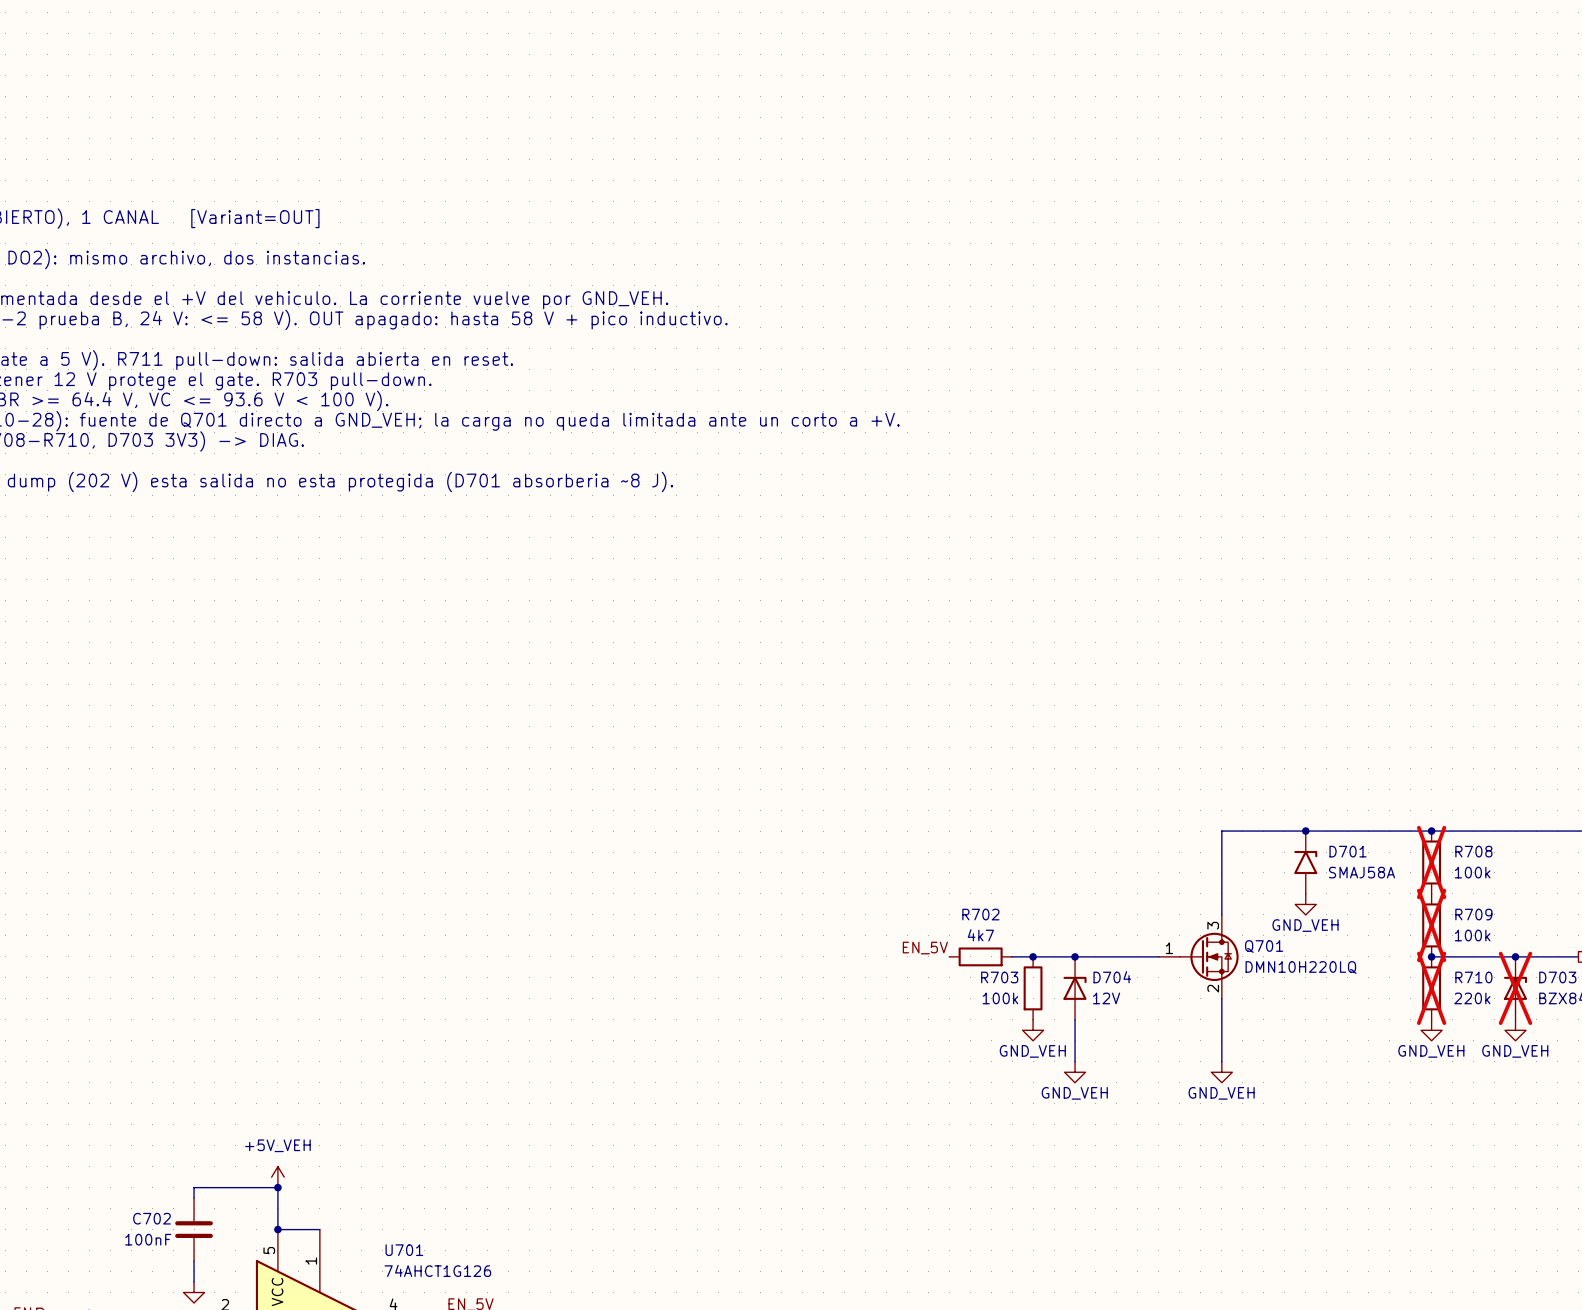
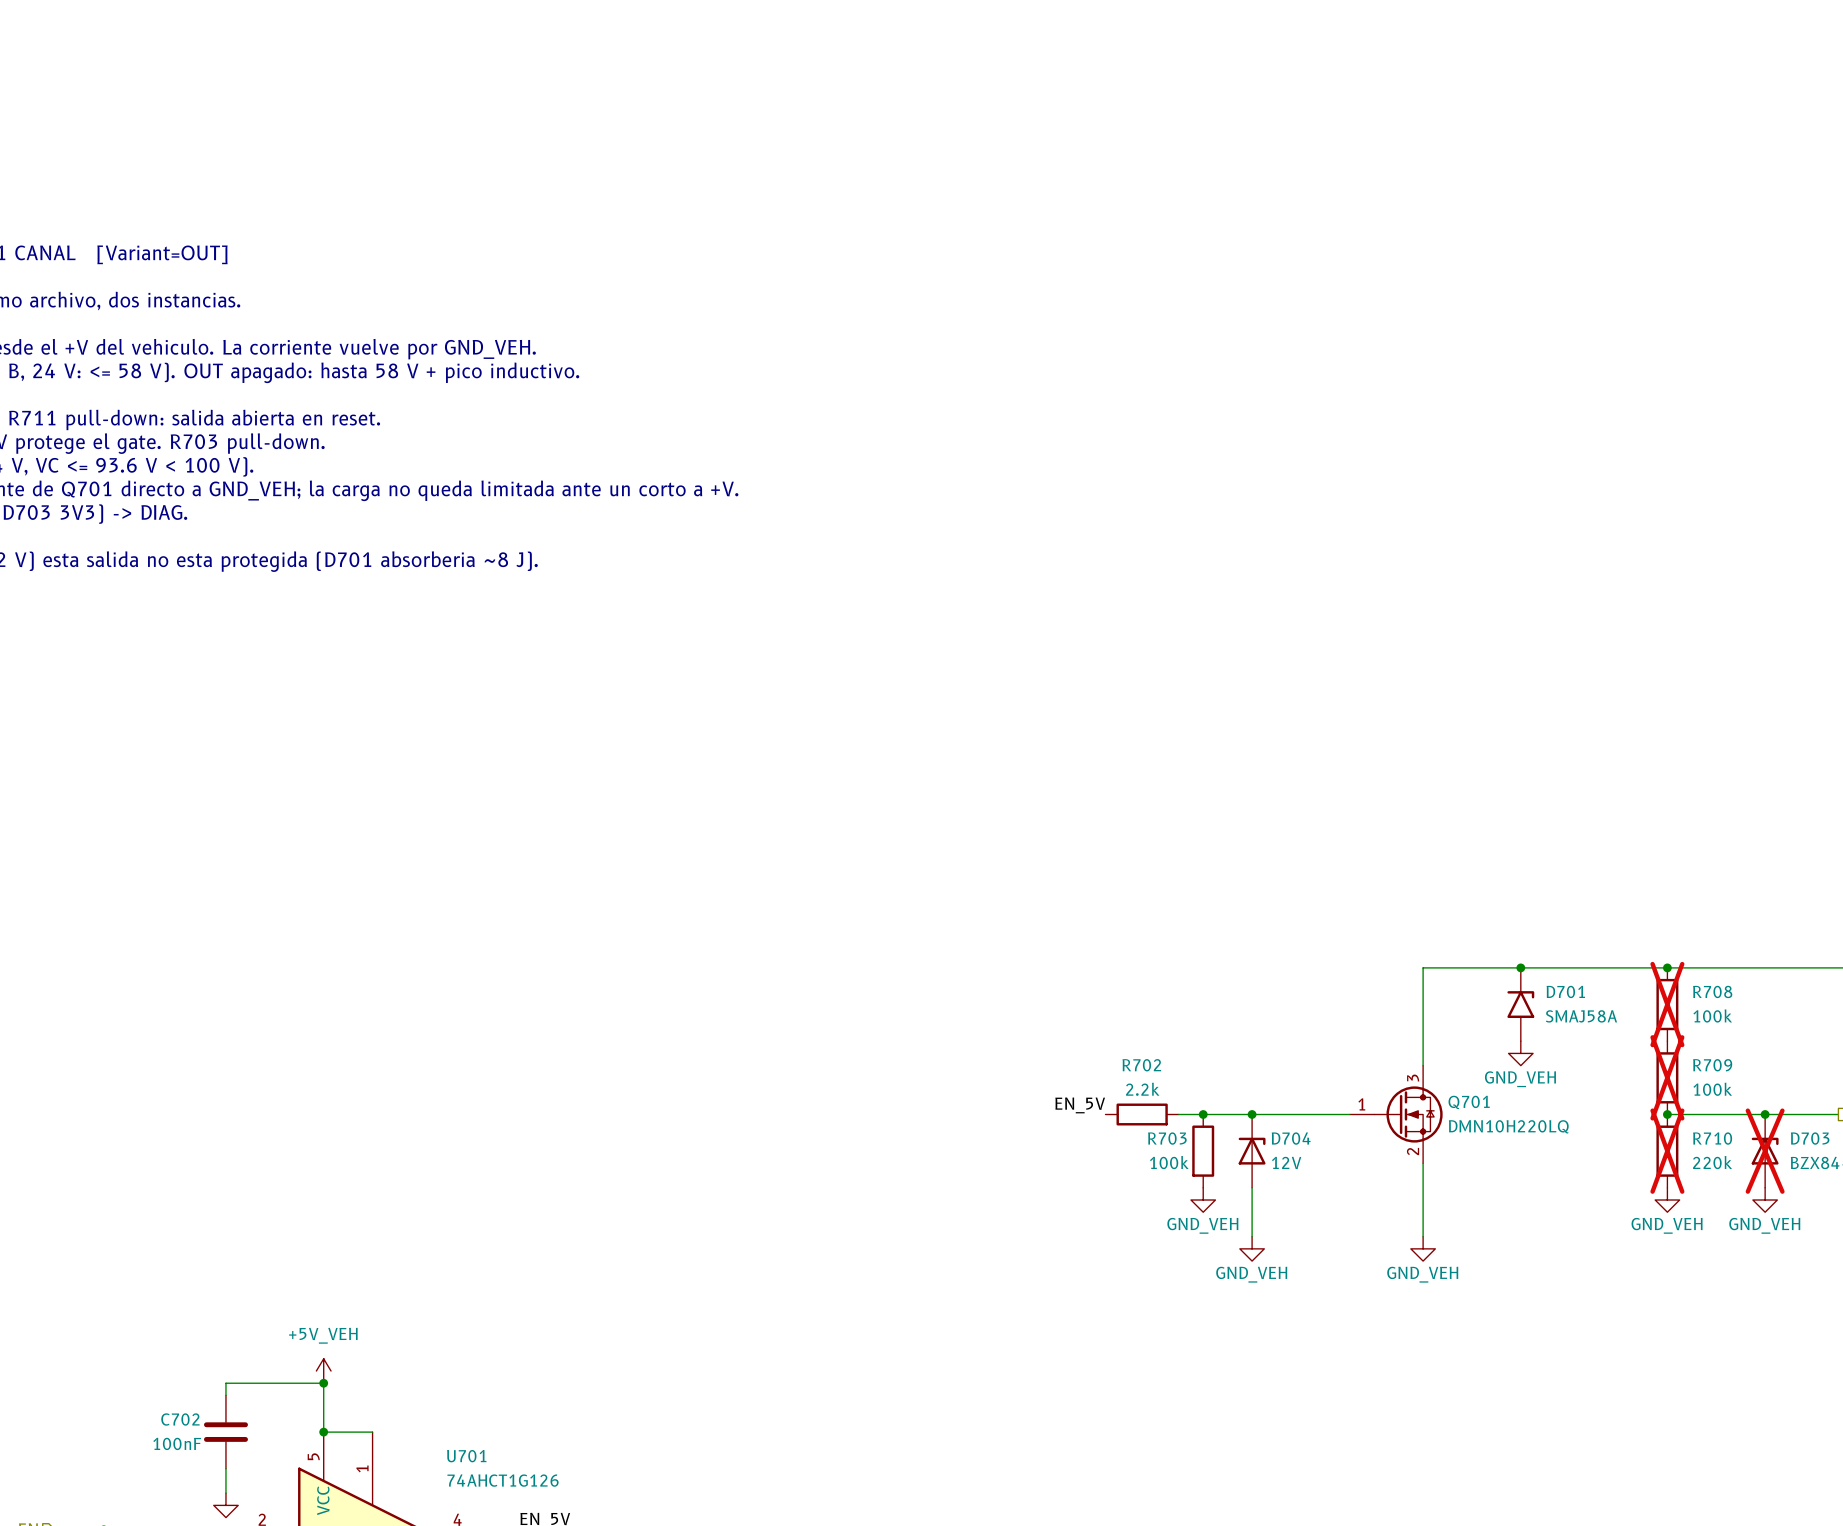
R702 value: 4k7 (980, 935) -> 2.2k (1142, 1089)

